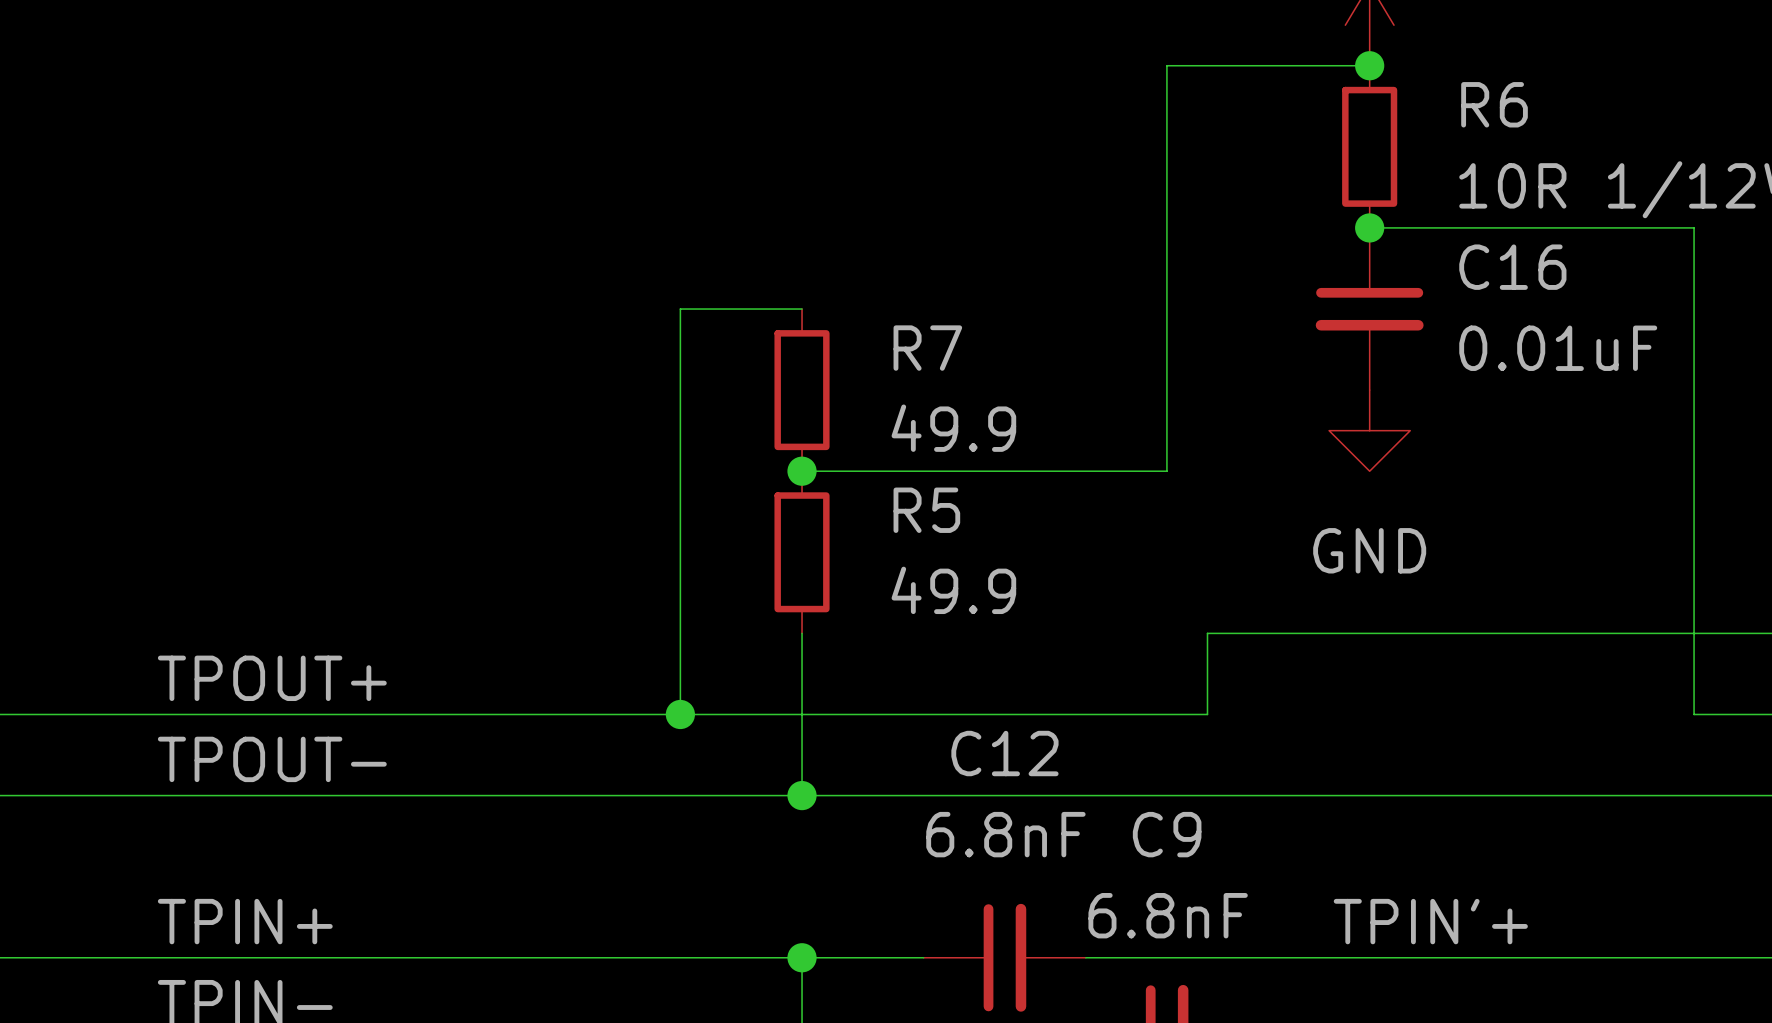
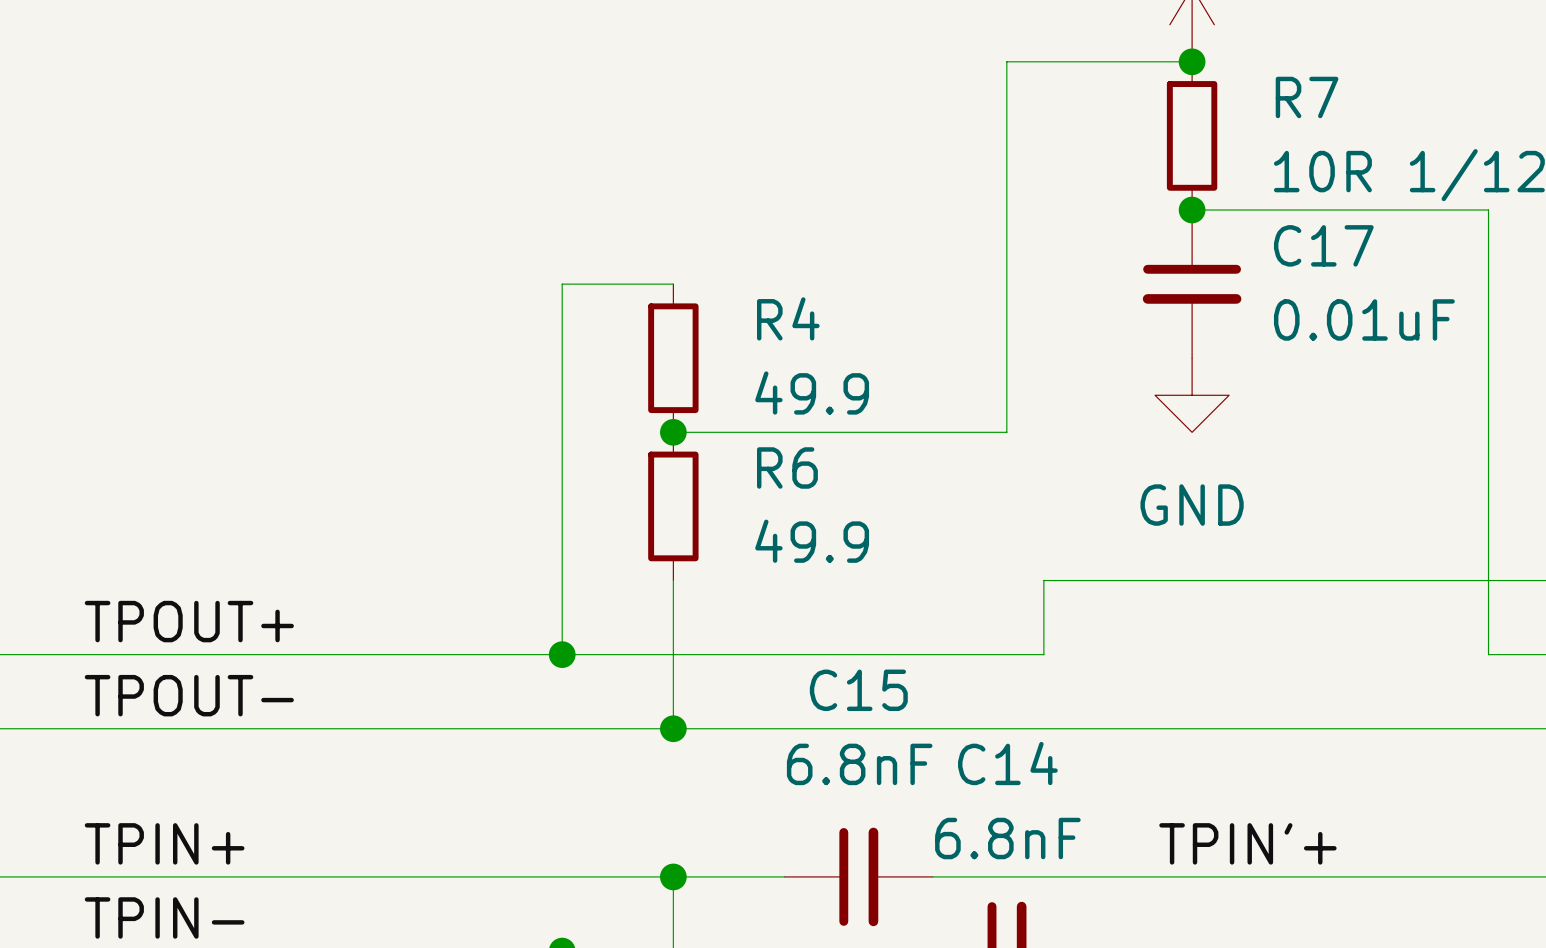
R6 name: R6 (1494, 104) -> R7 (1307, 97)
C16 name: C16 (1512, 267) -> C17 (1323, 245)
R7 name: R7 (927, 348) -> R4 (788, 318)
R5 name: R5 (926, 510) -> R6 (787, 467)
C12 name: C12 (1004, 753) -> C15 (858, 690)
C9 name: C9 (1167, 834) -> C14 (1007, 763)

